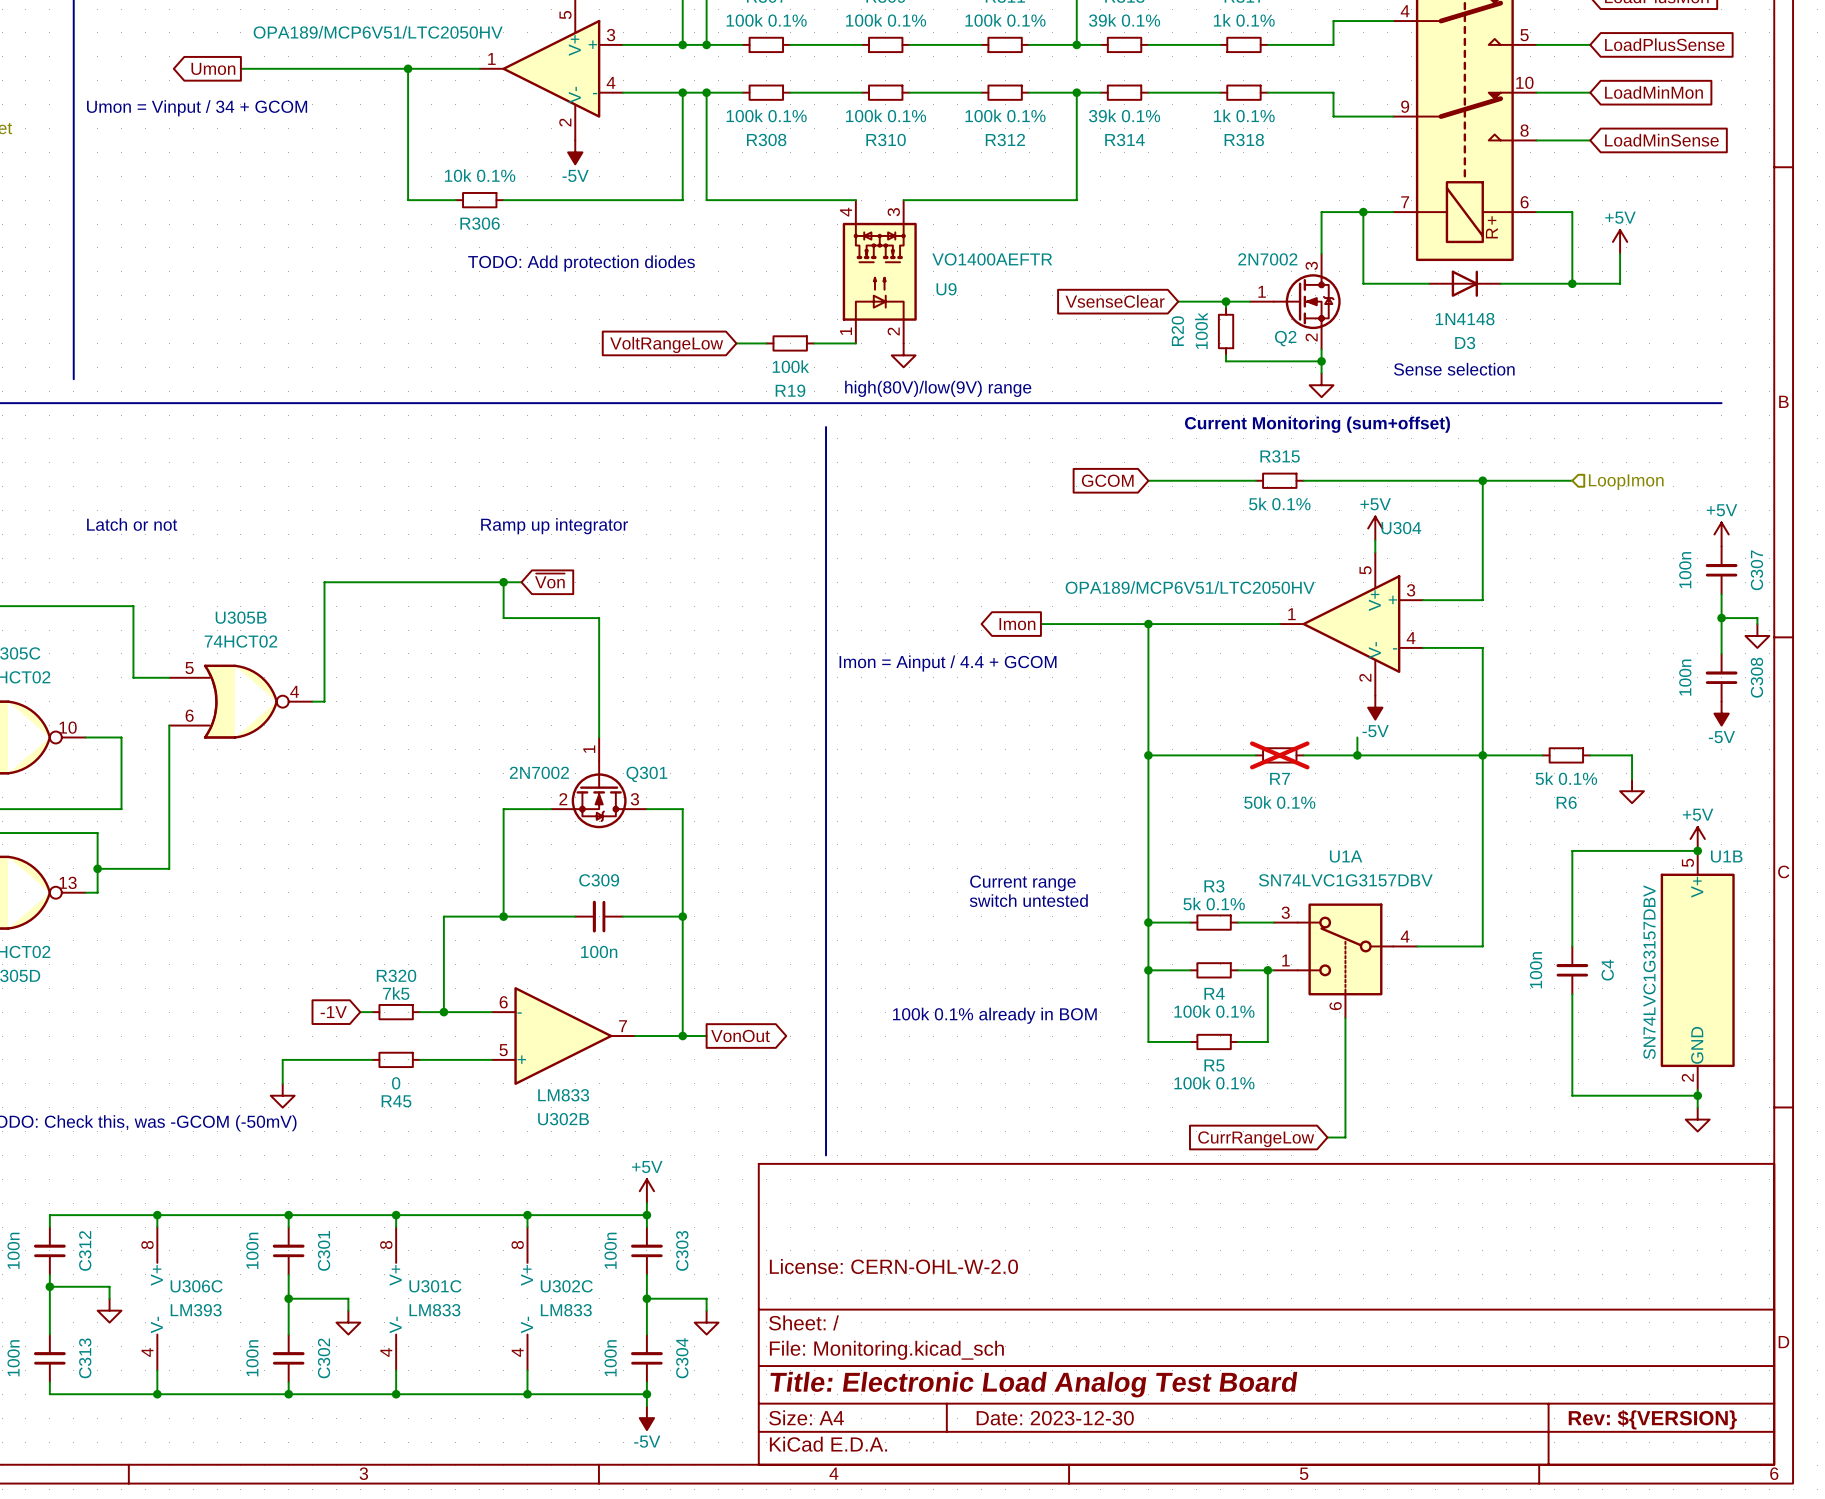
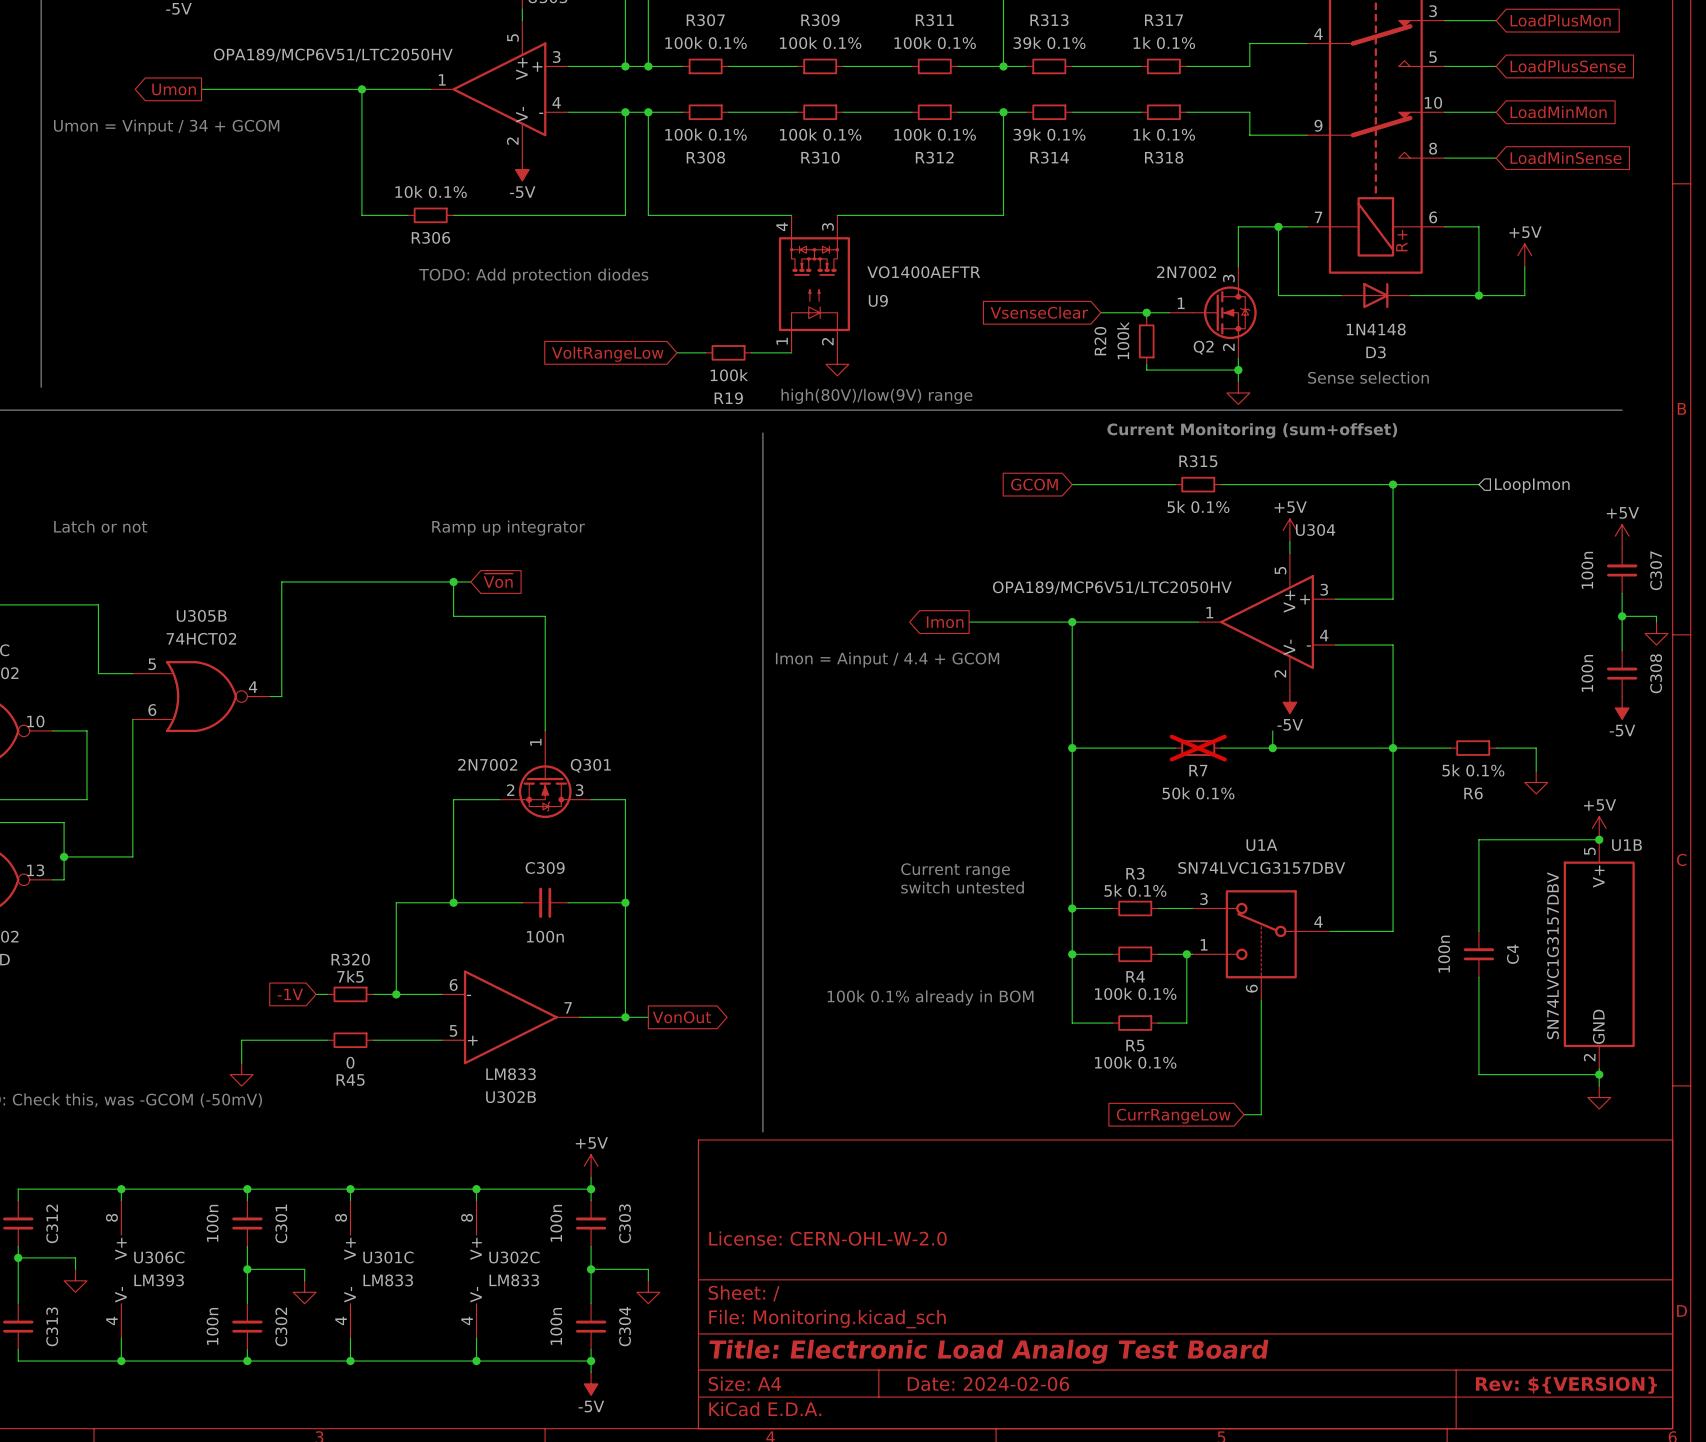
title block: Date: 2023-12-30 (1055, 1418) -> Date: 2024-02-06 (988, 1383)

